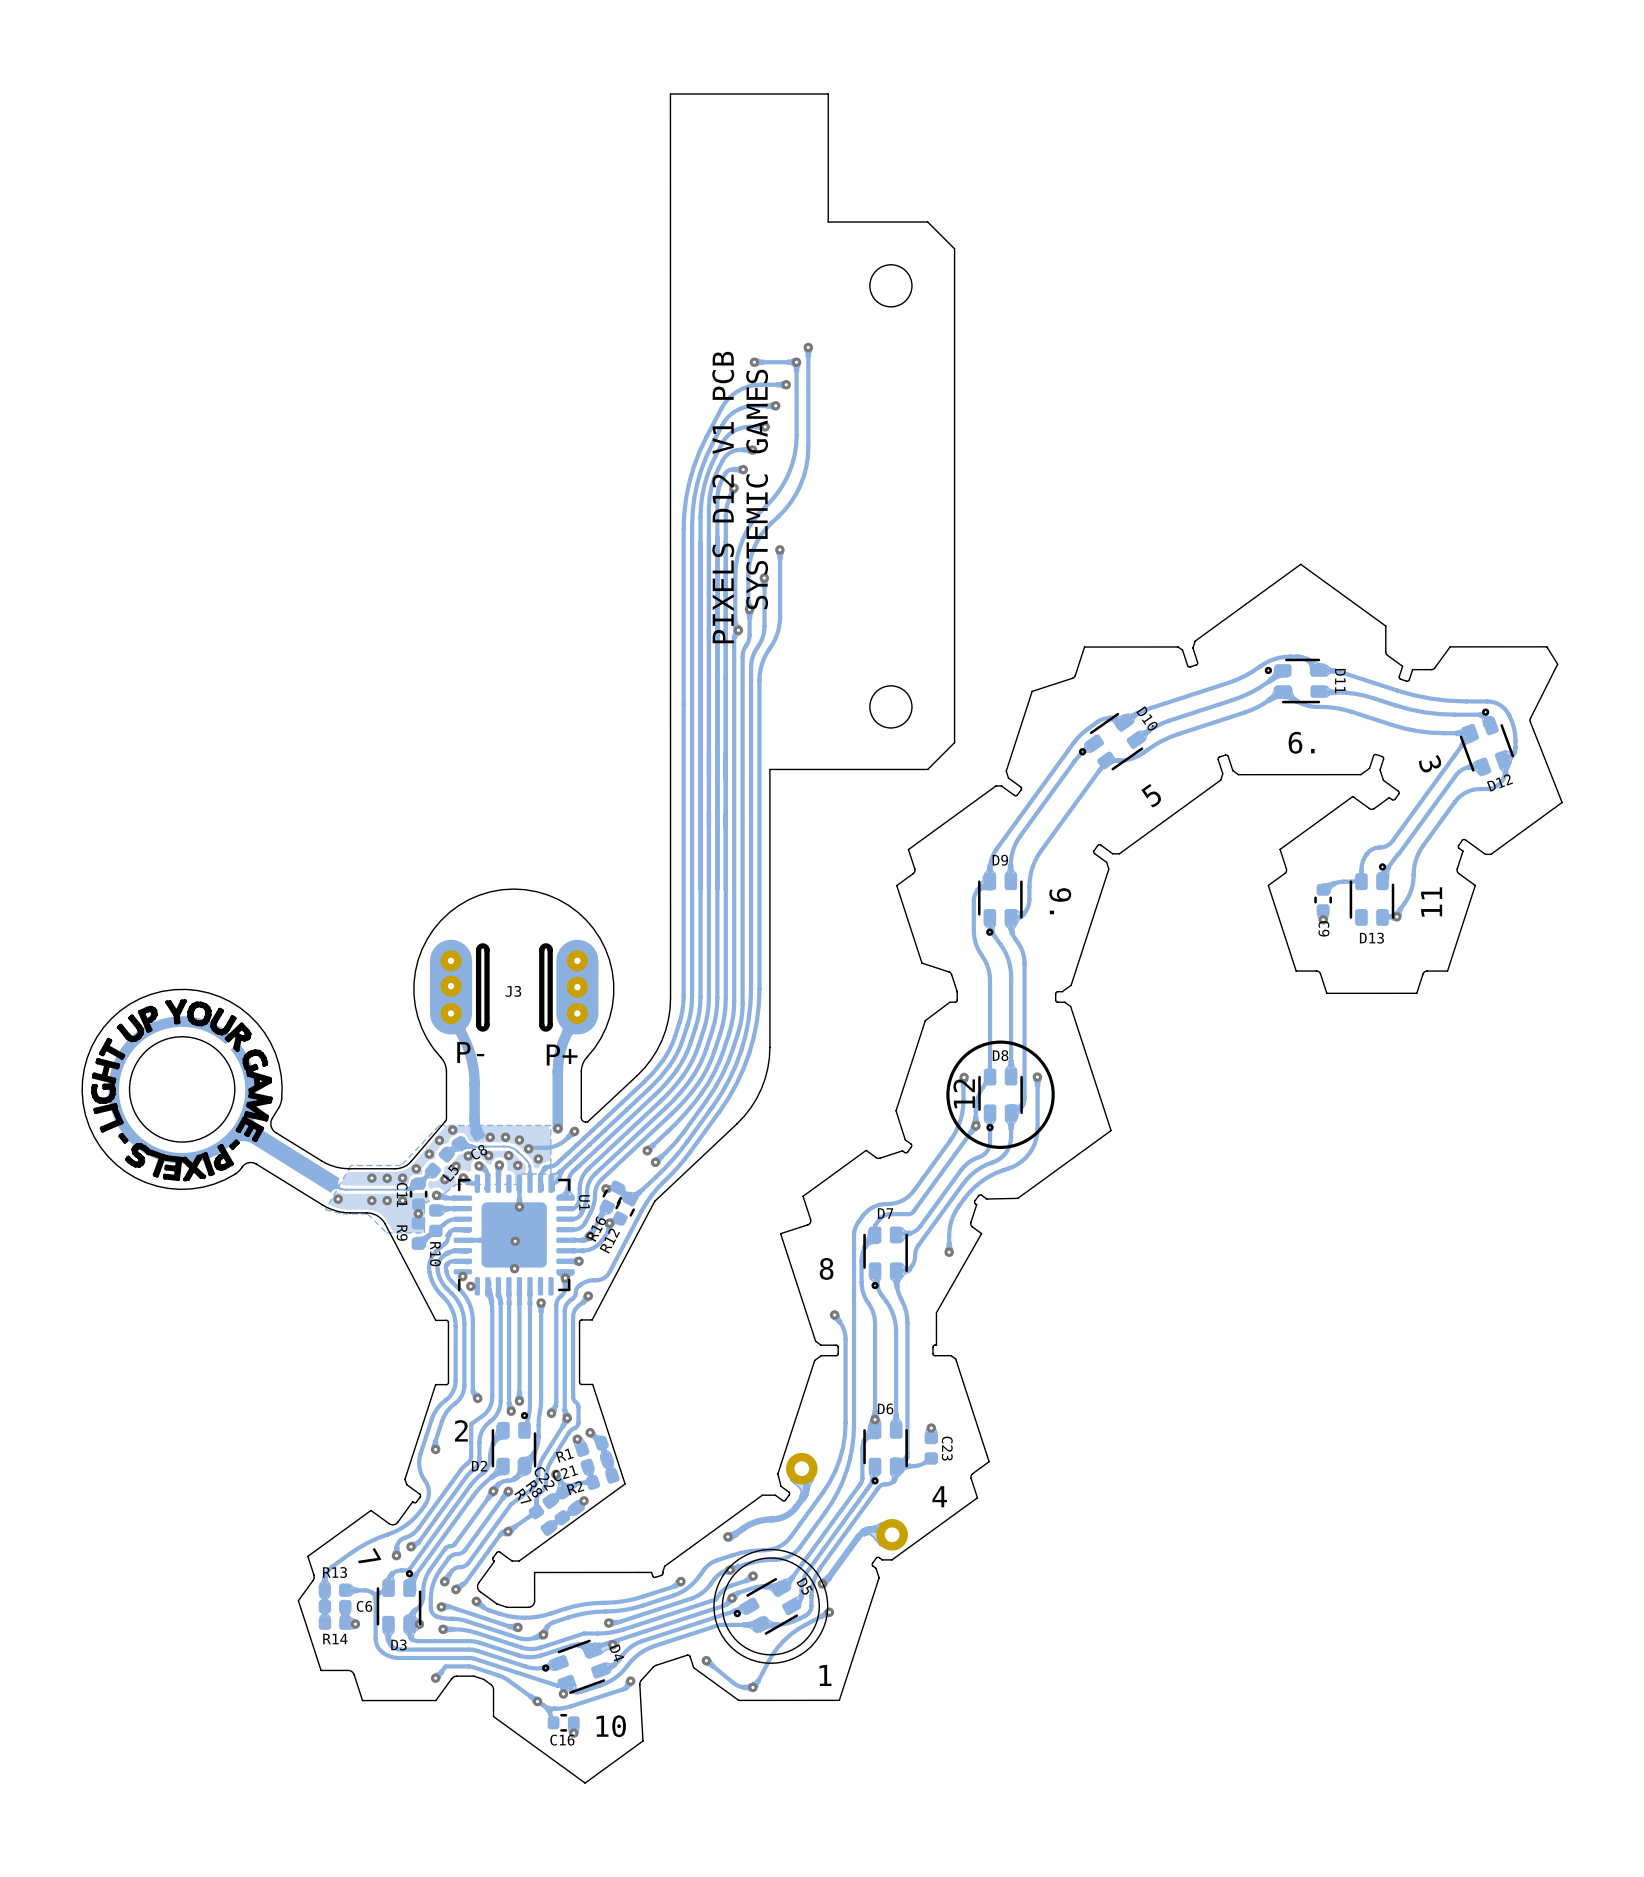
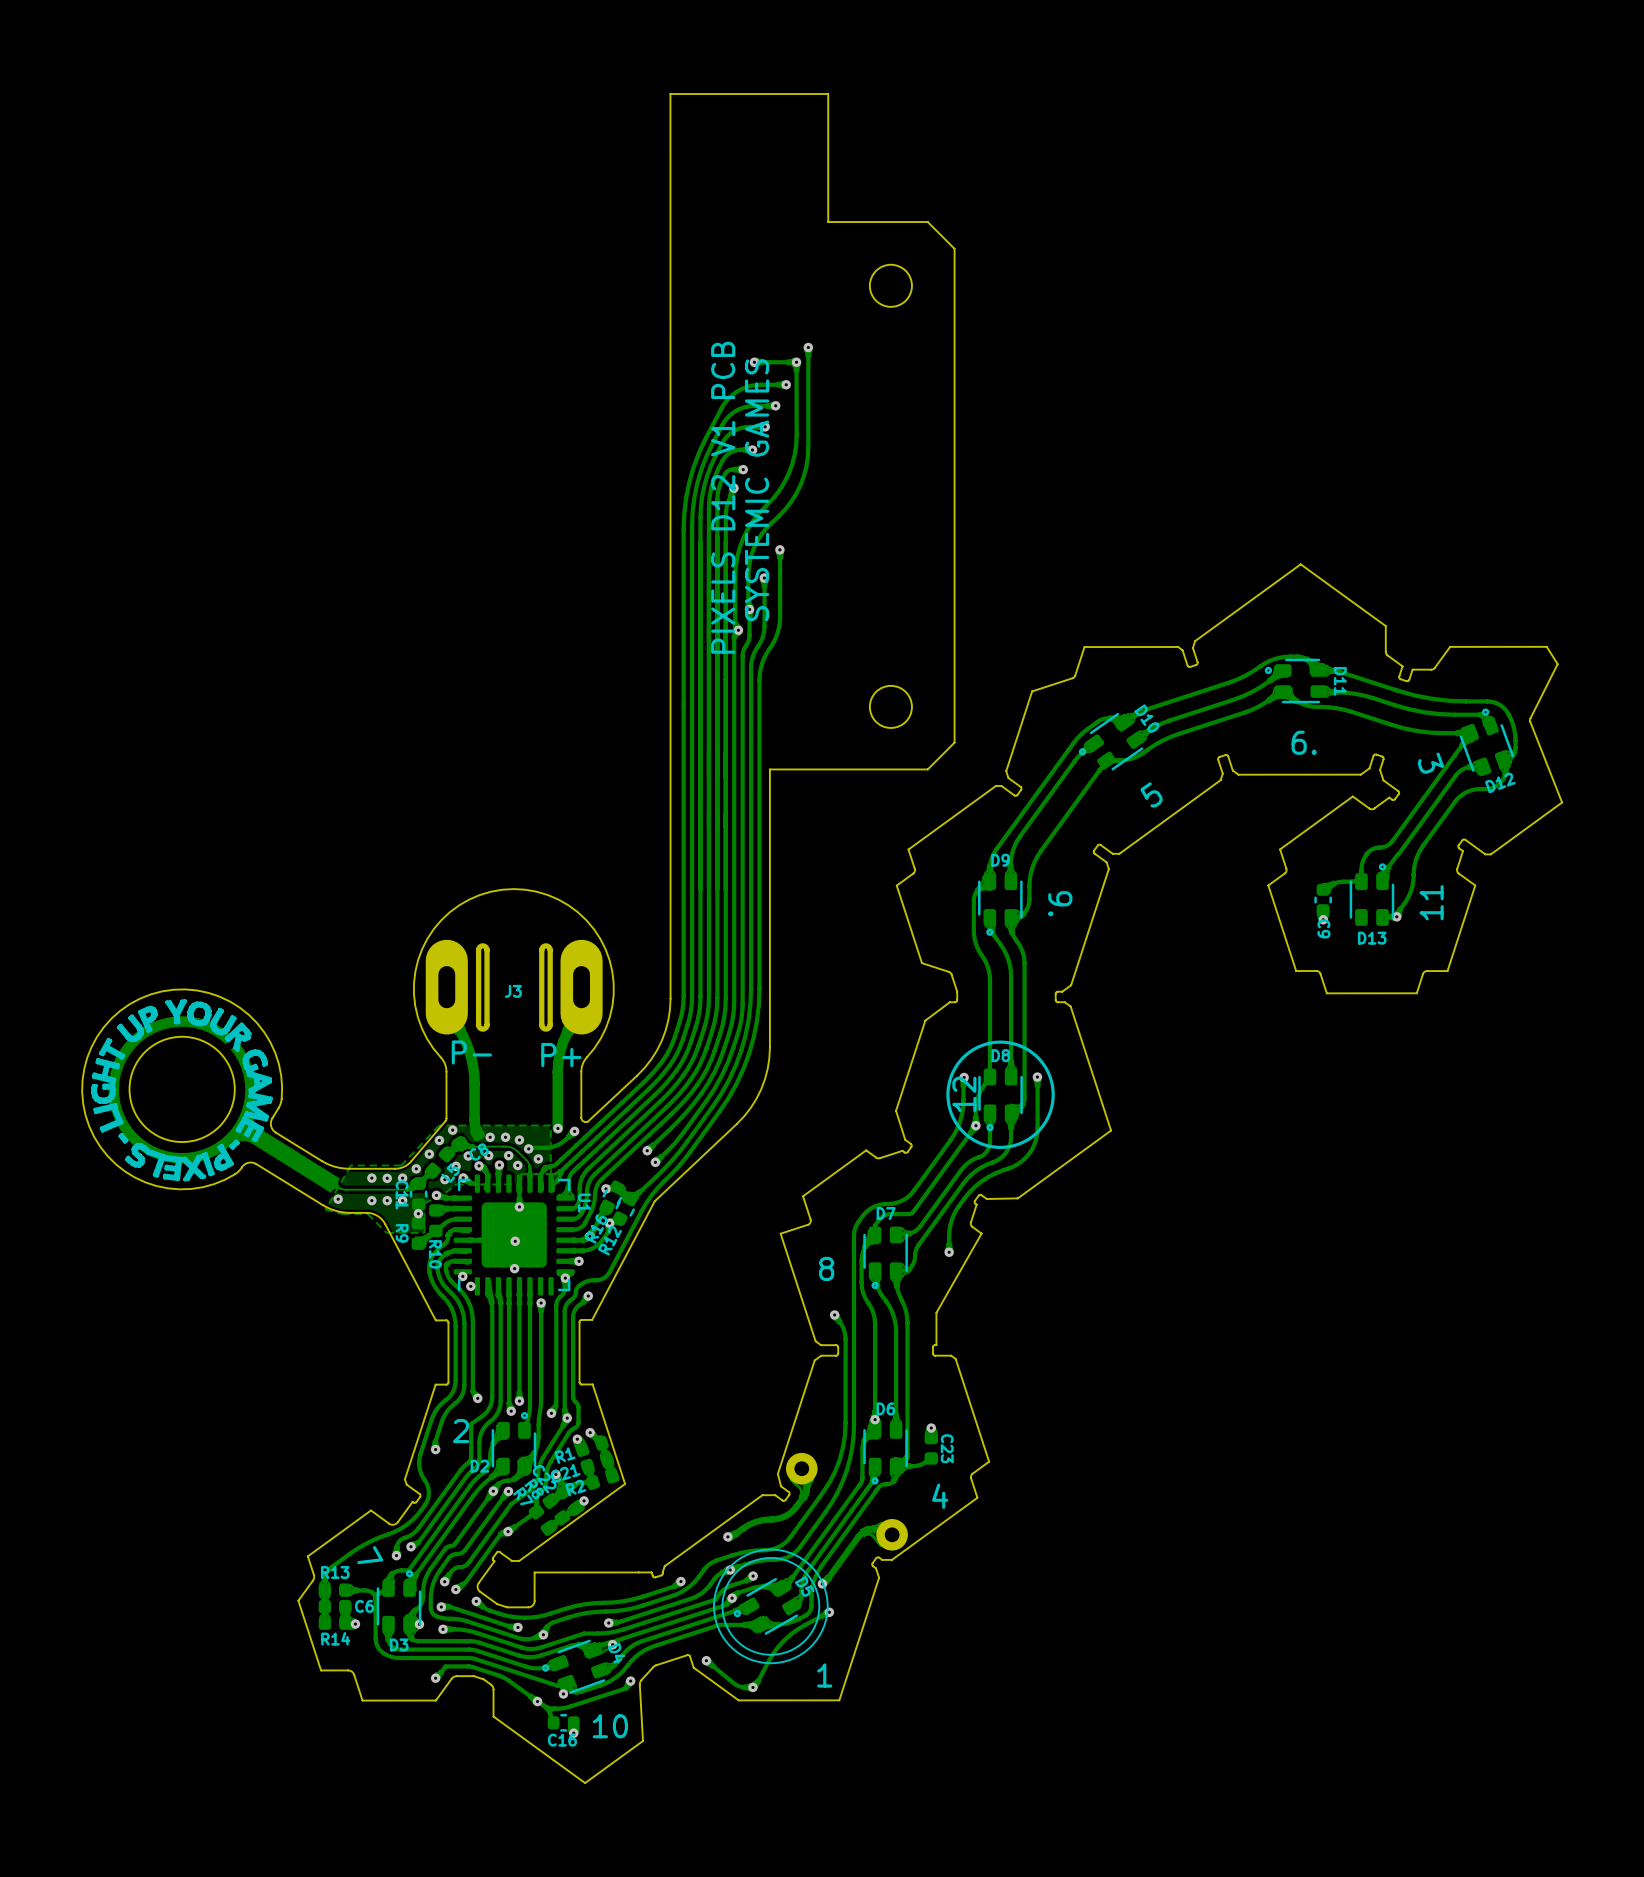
J3 footprint: [429, 939, 599, 1035] -> [425, 939, 603, 1035]

